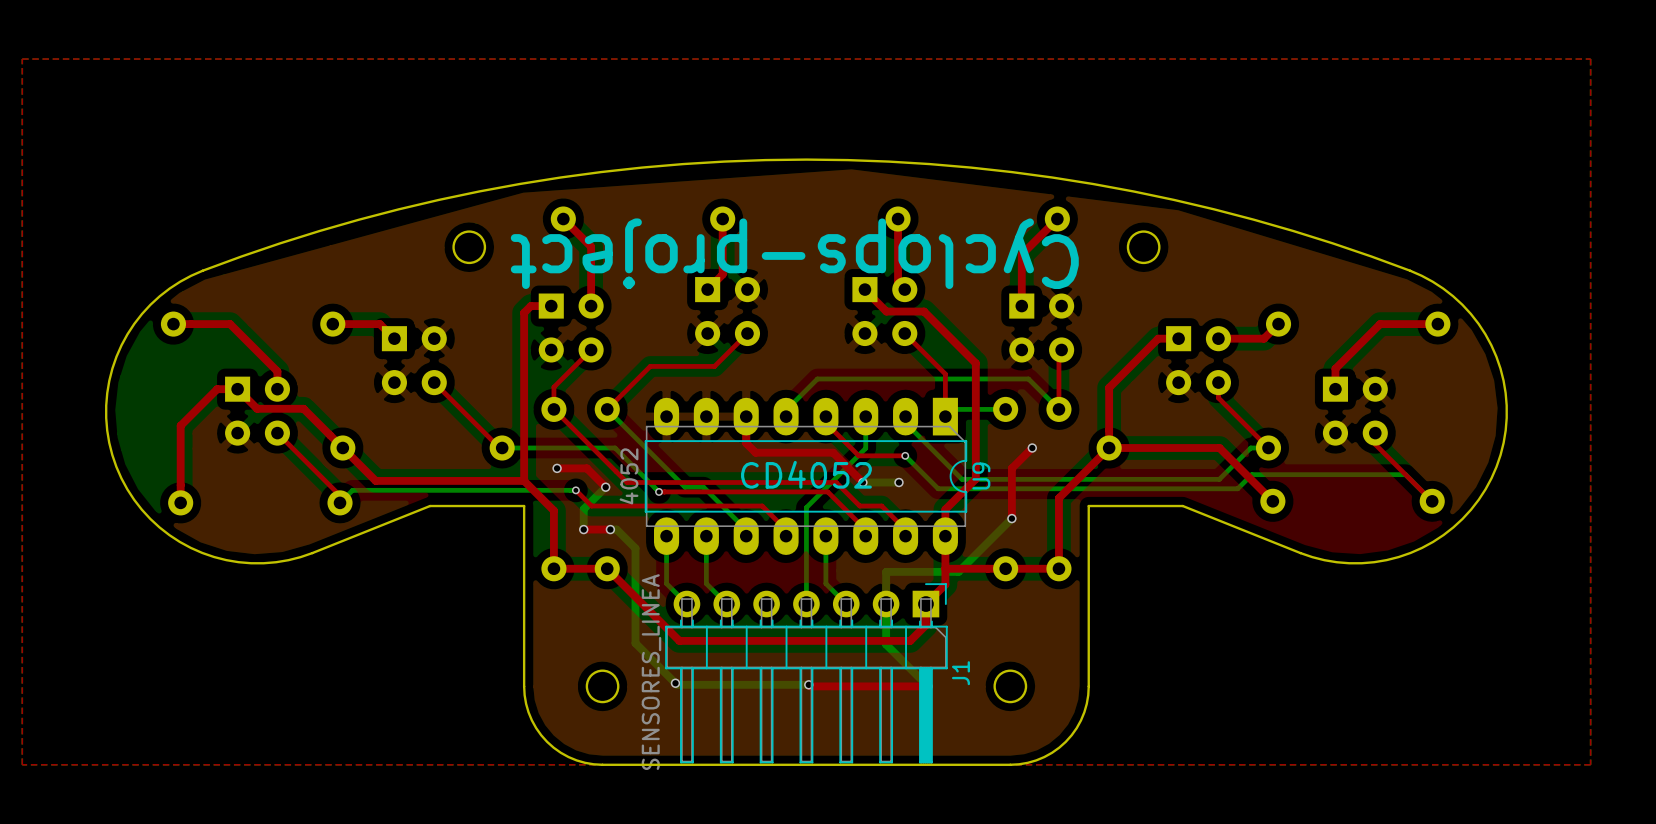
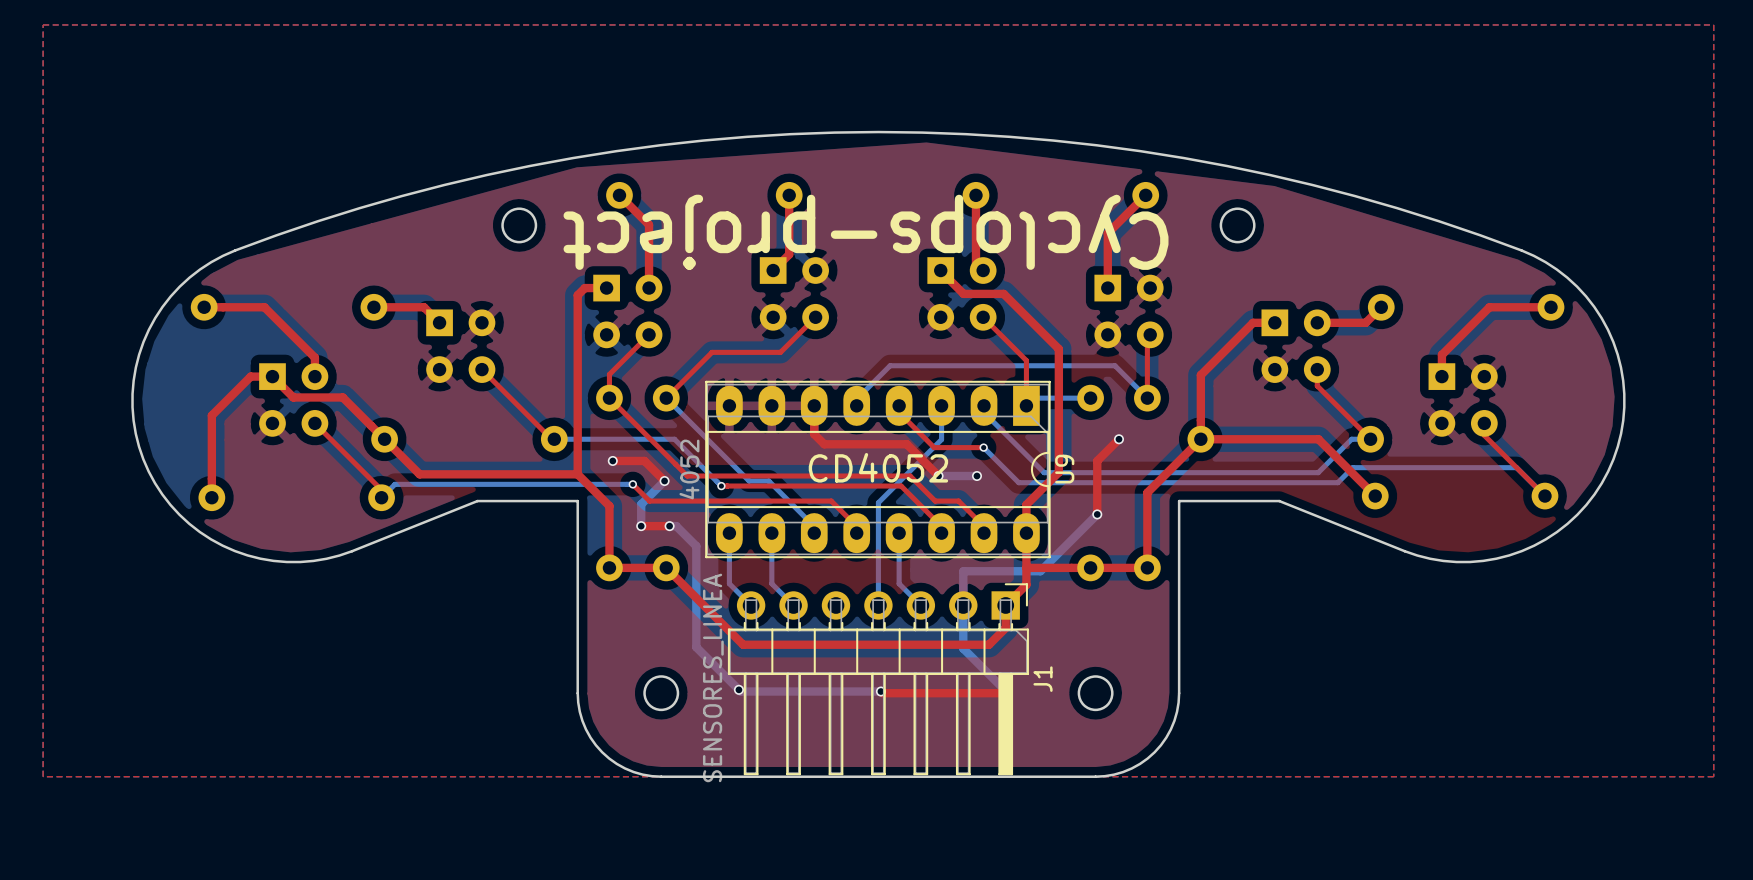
U9 footprint: [644, 397, 968, 555] -> [705, 380, 1051, 559]

